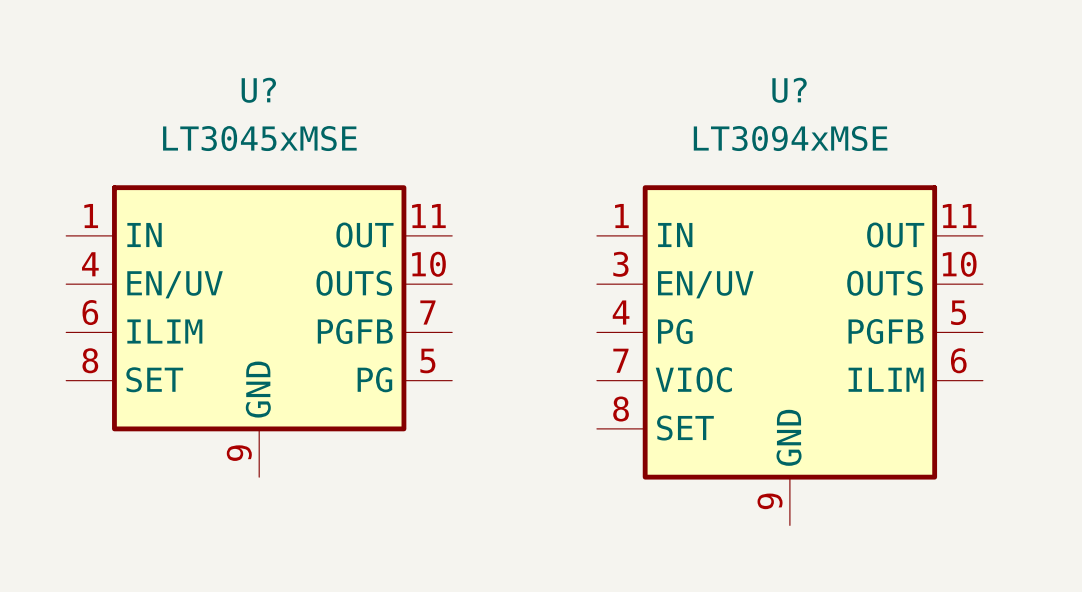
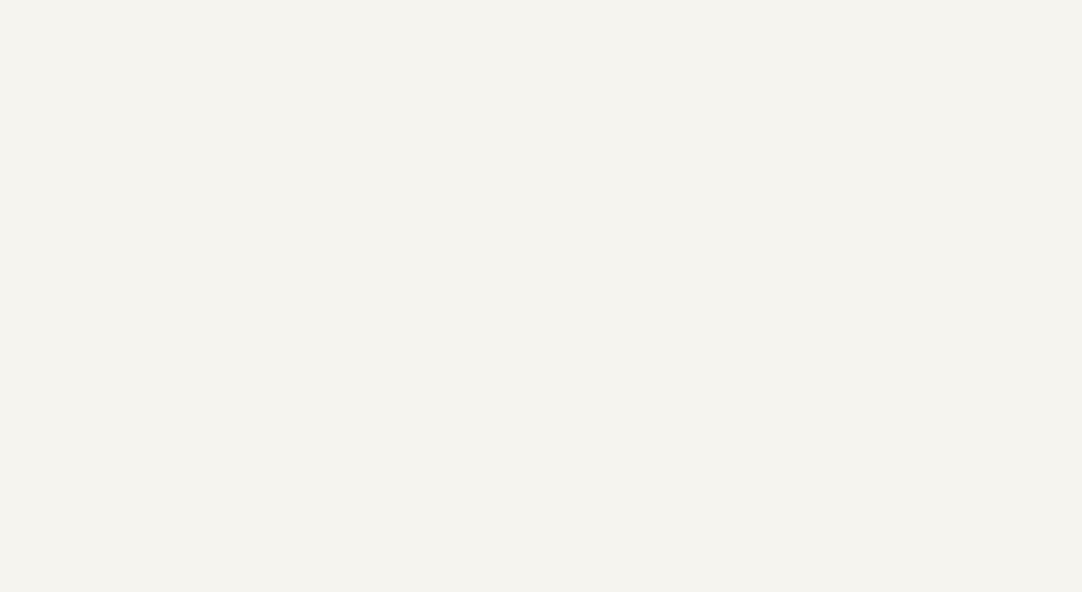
U?: LT3045xMSE (259, 331) -> none
U?: LT3094xMSE (789, 355) -> none

